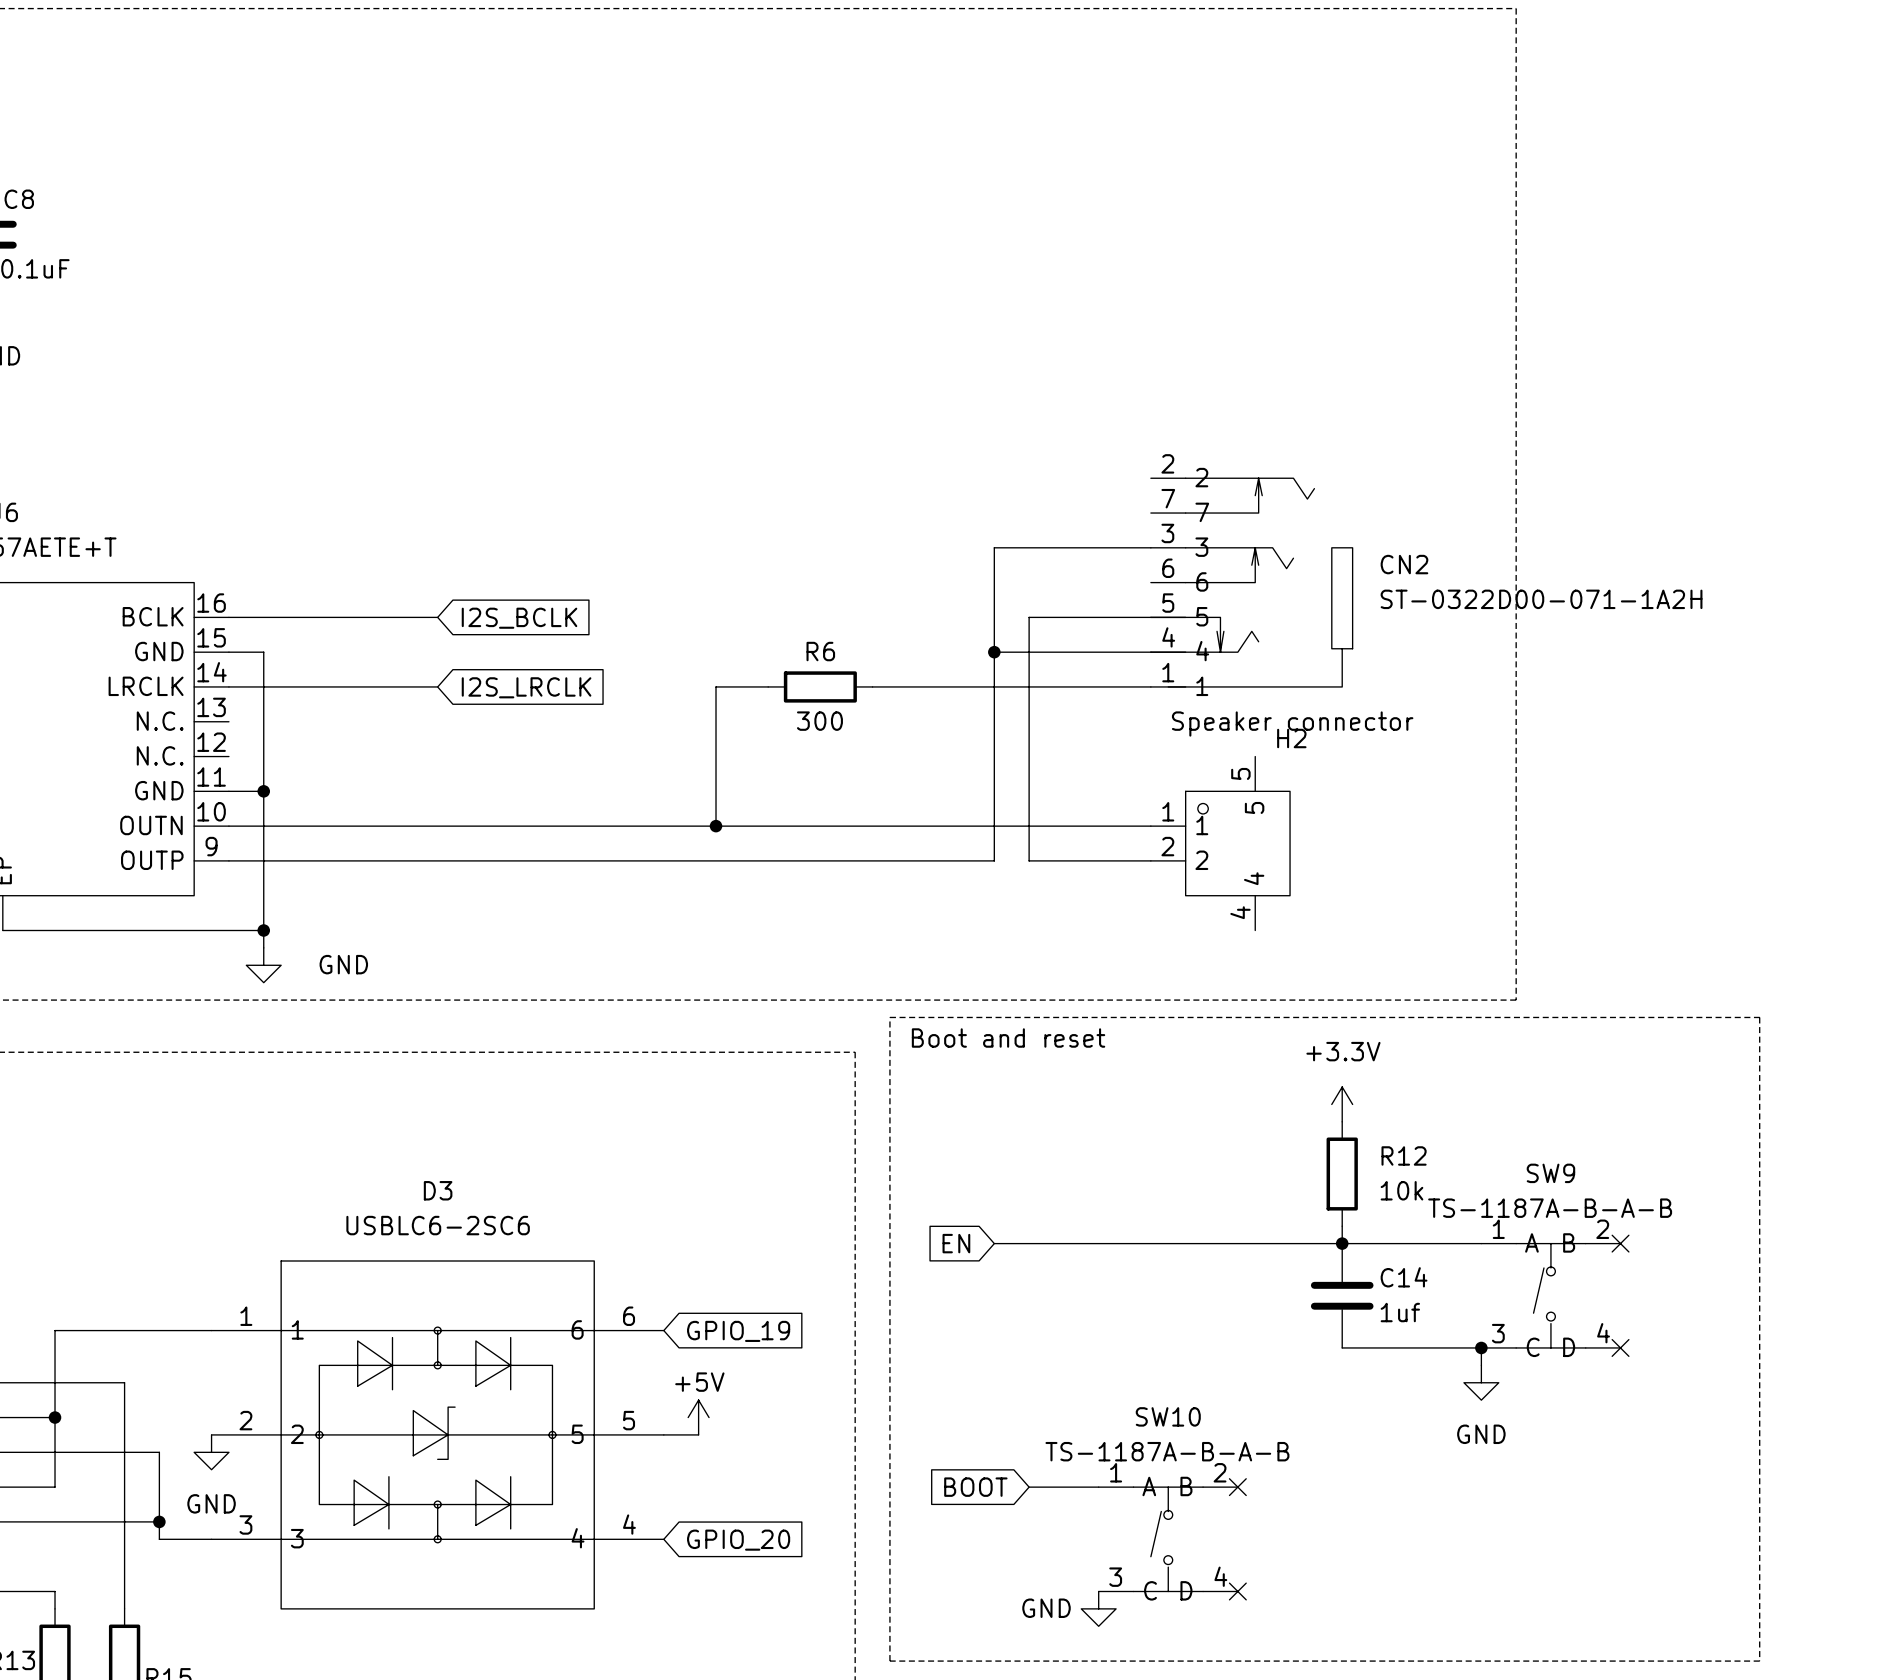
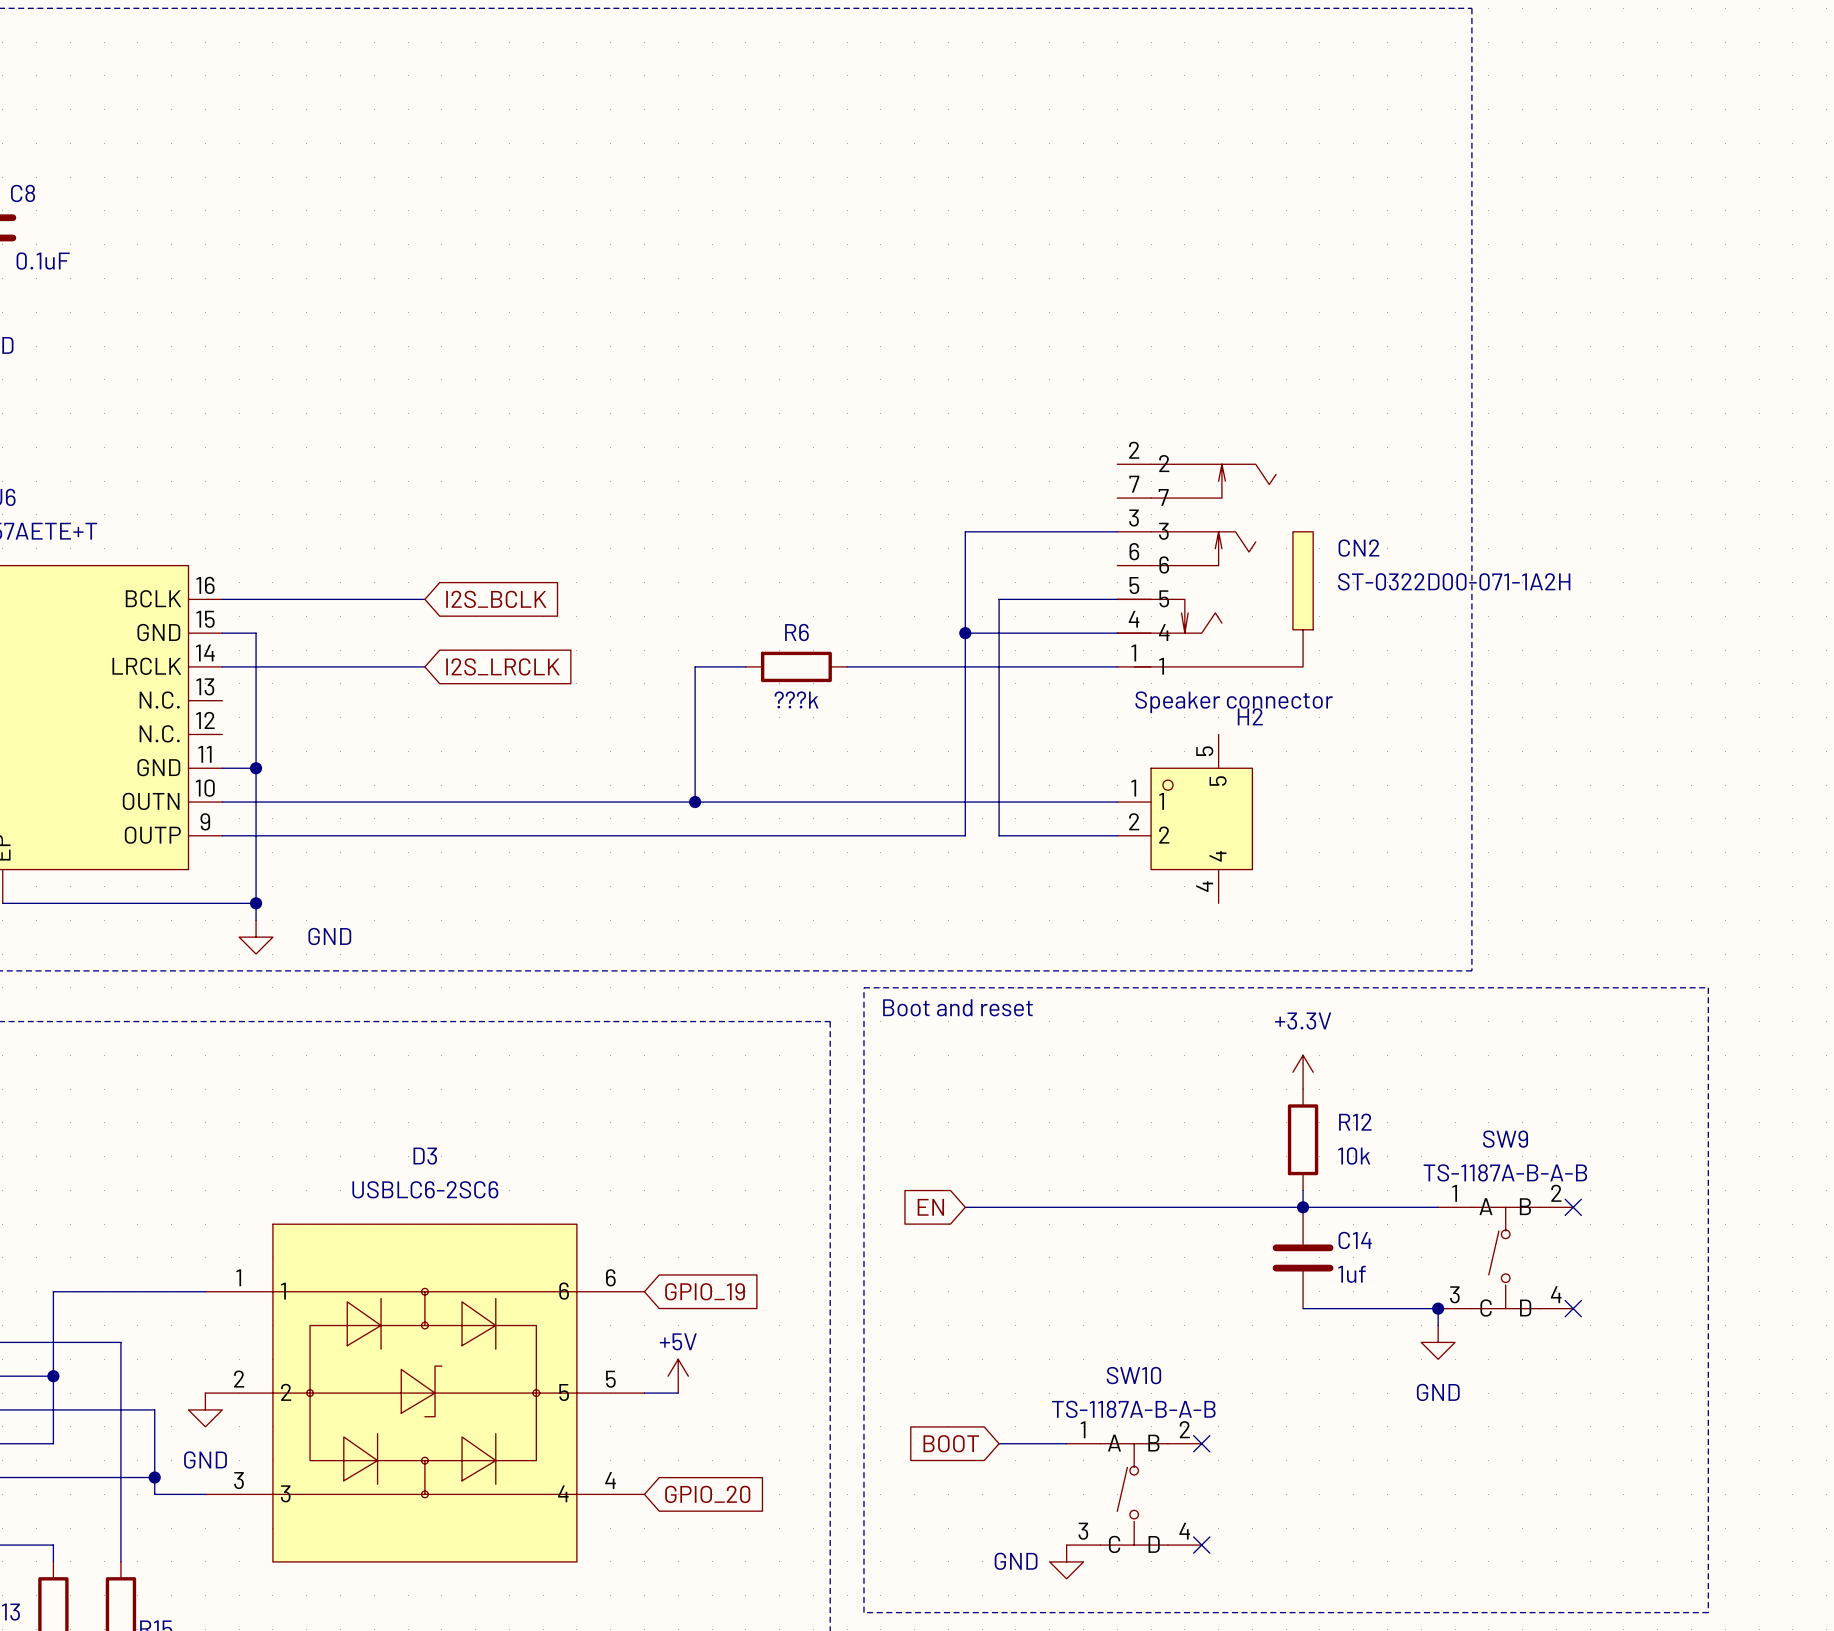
R6 value: 300 (819, 721) -> ???k (796, 699)

